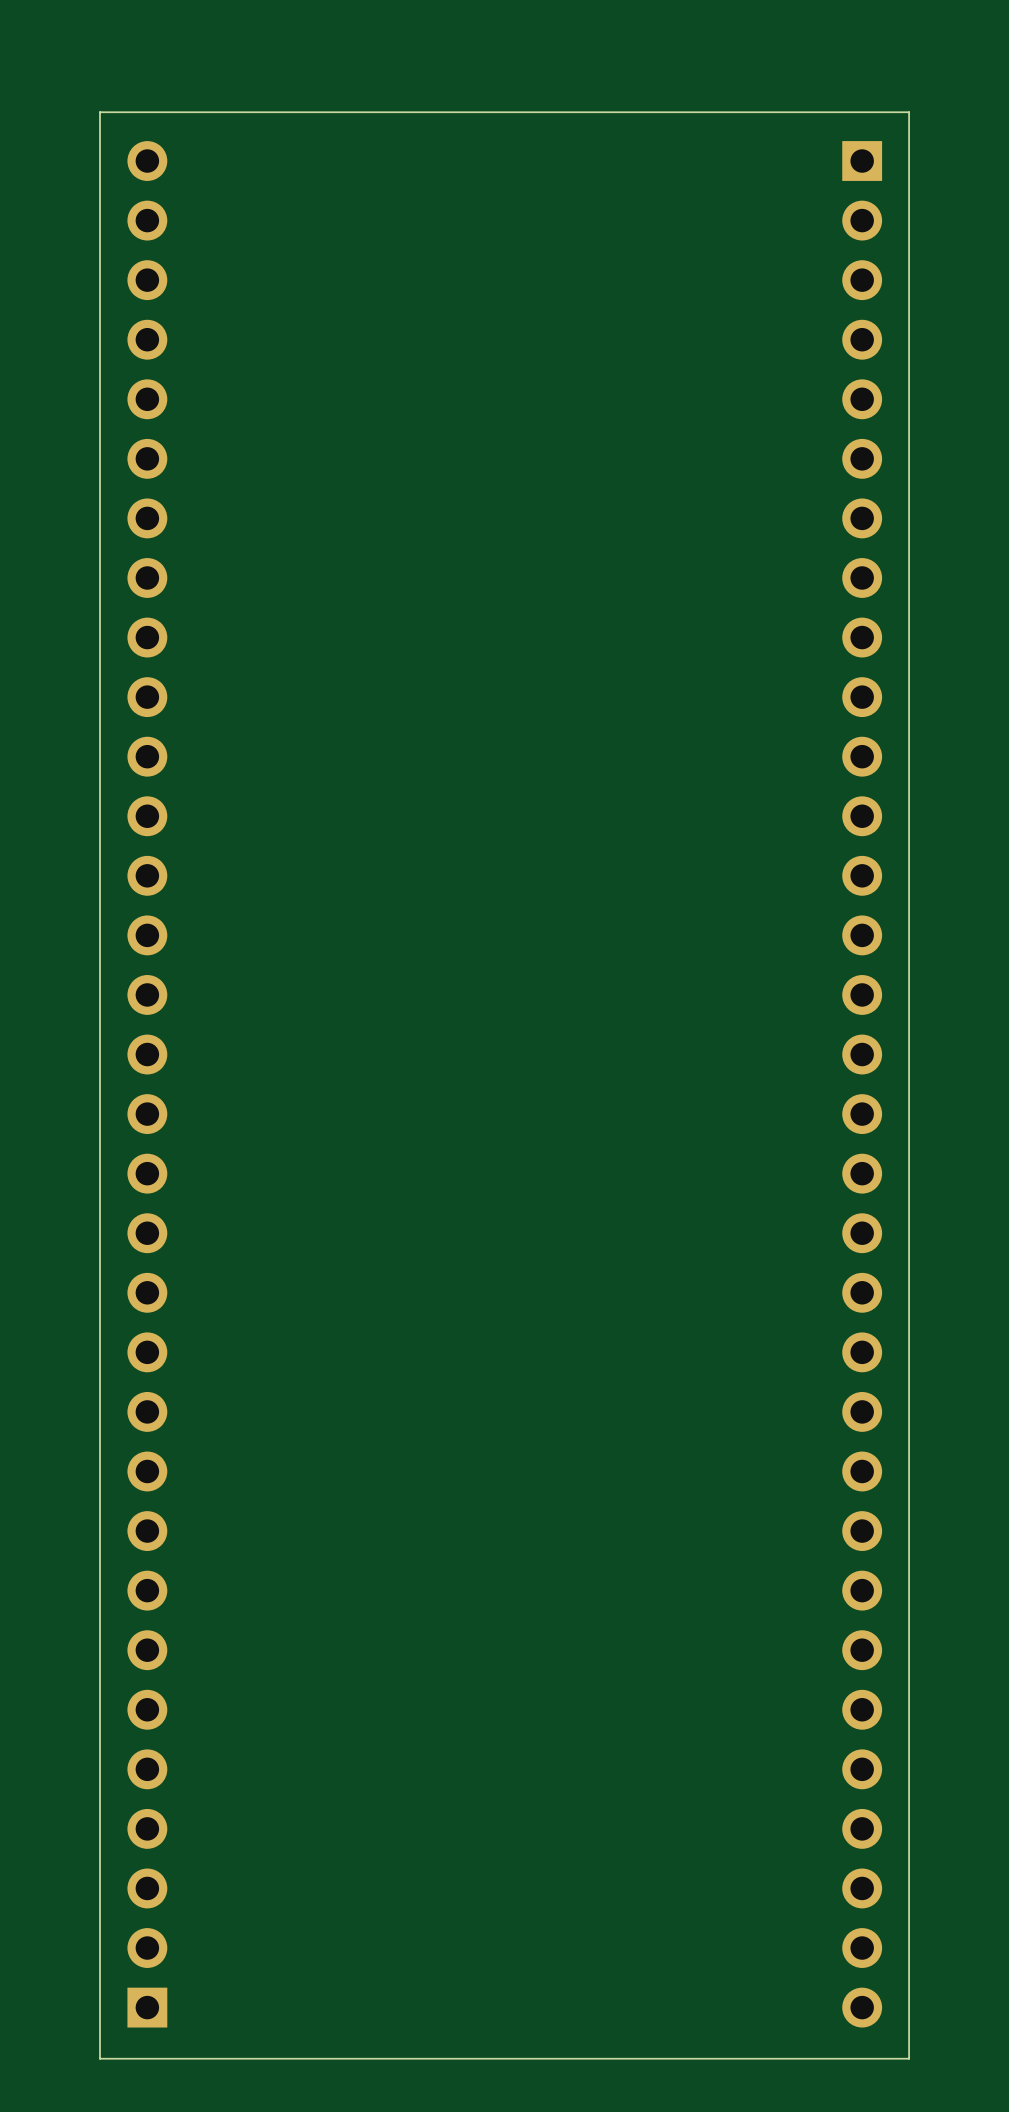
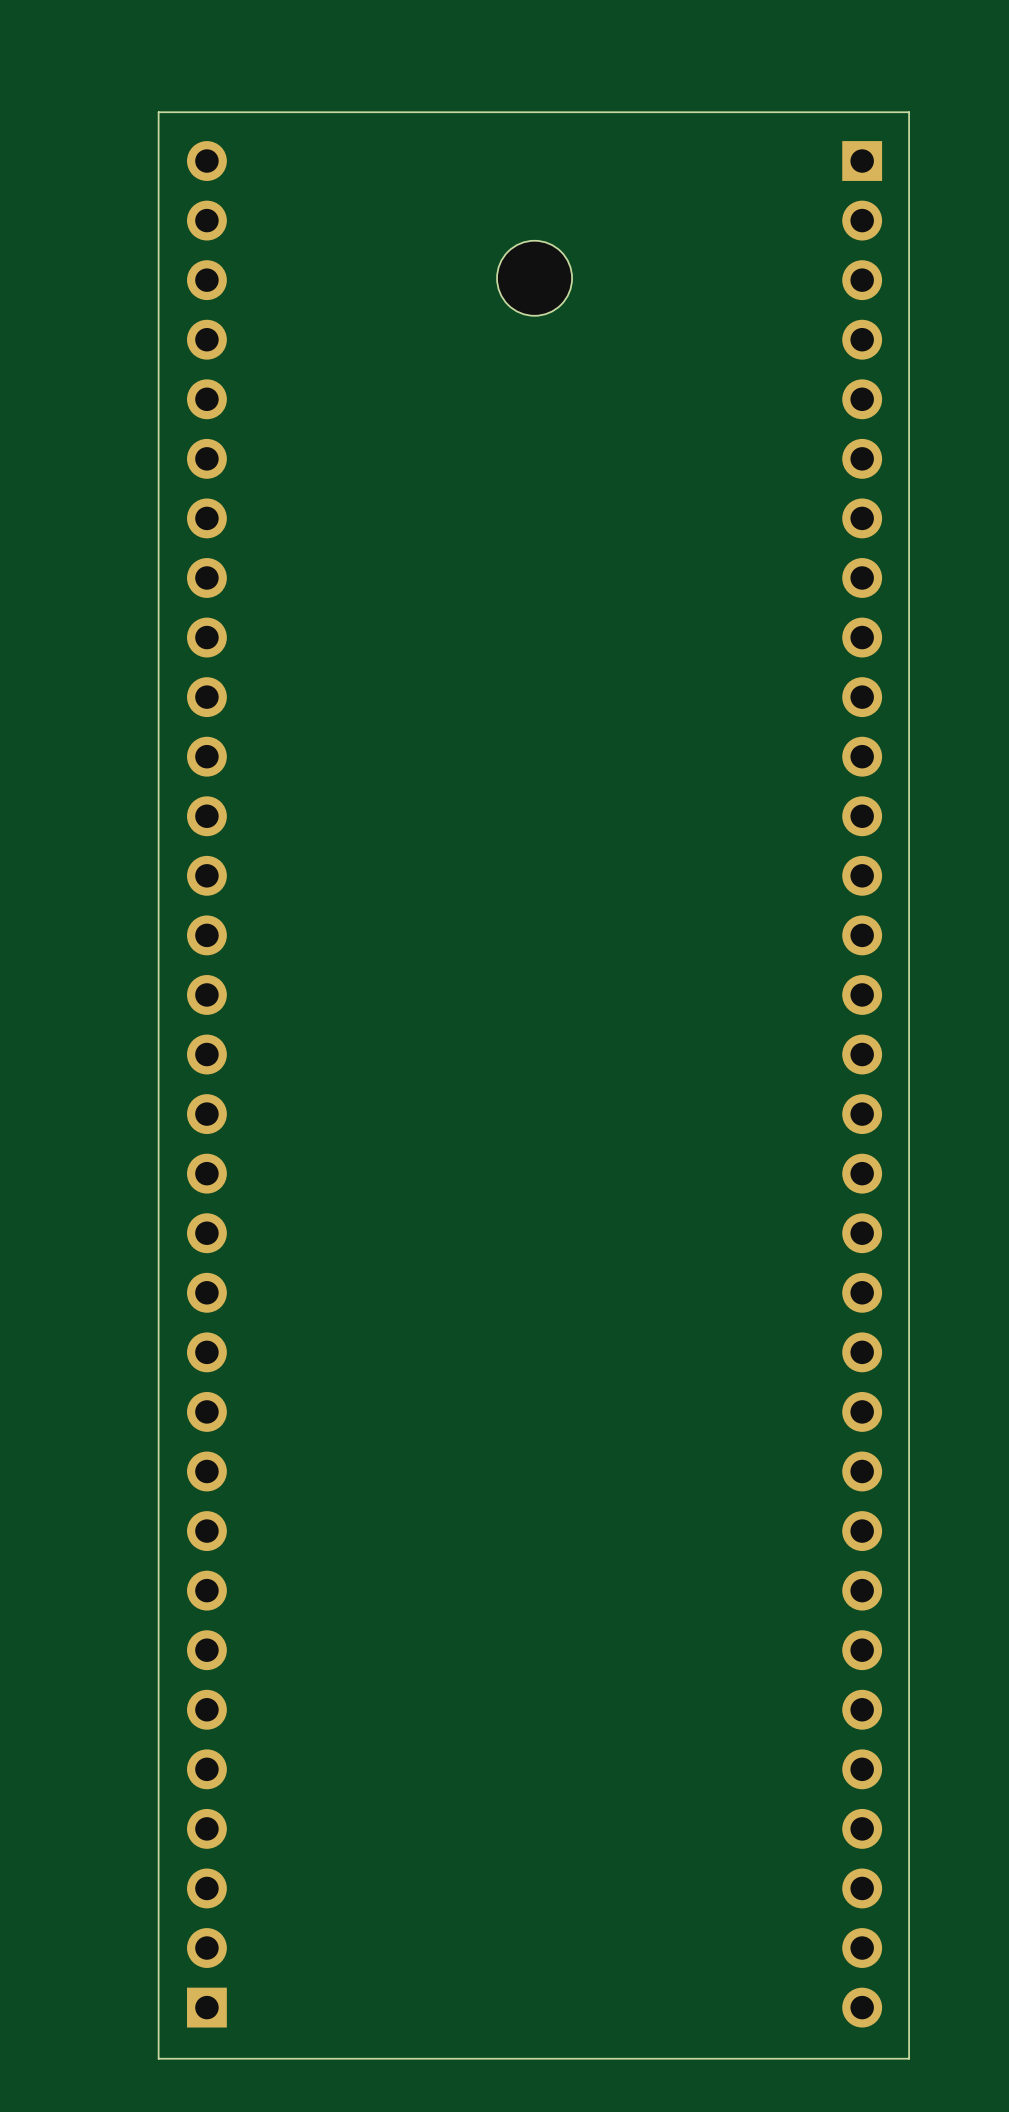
board edge: (158, 112) (99, 112) (99, 2058) (158, 2058) -> (158, 112) (158, 2058)
part: none -> (534, 278)
part position: (147, 1084) -> (206, 1084)

